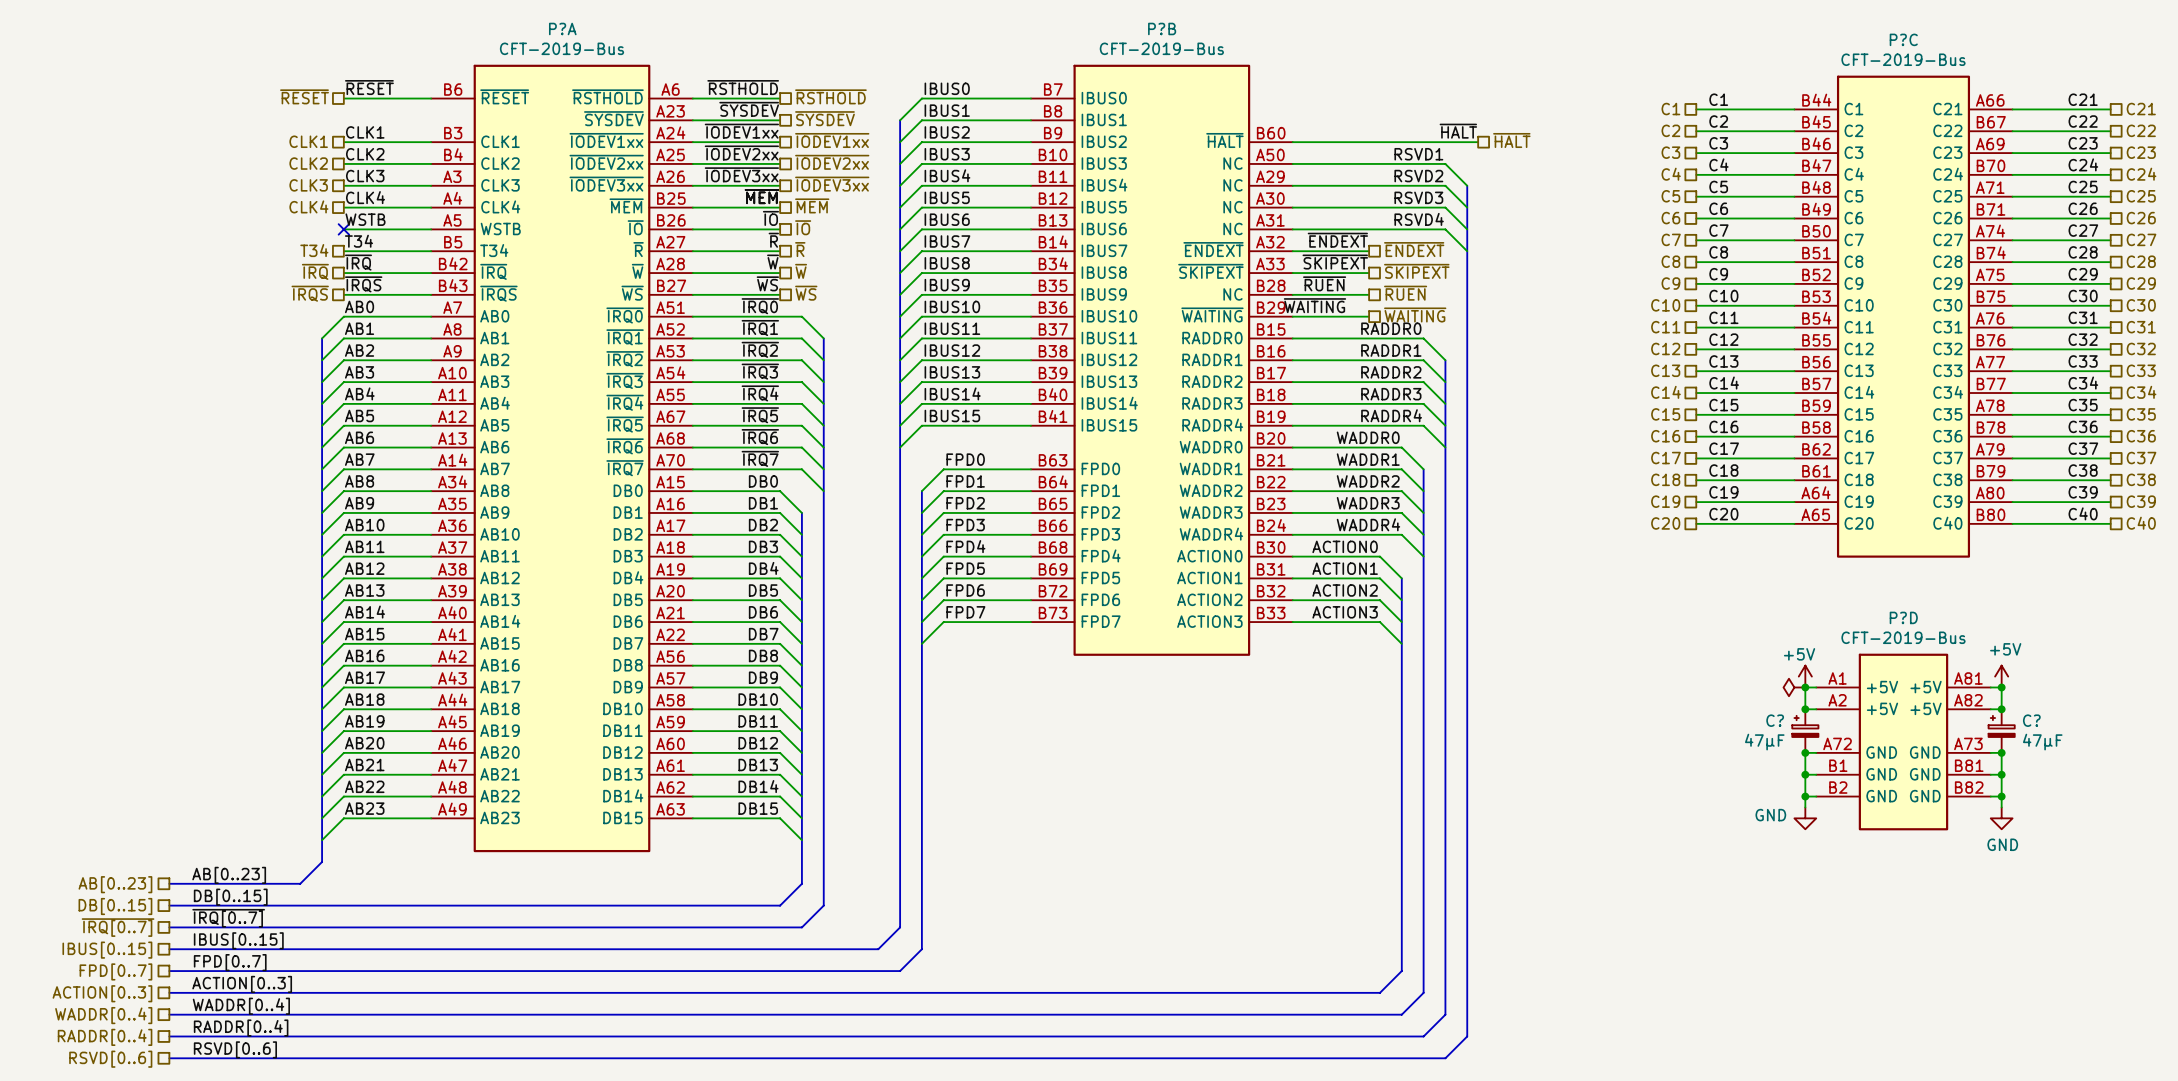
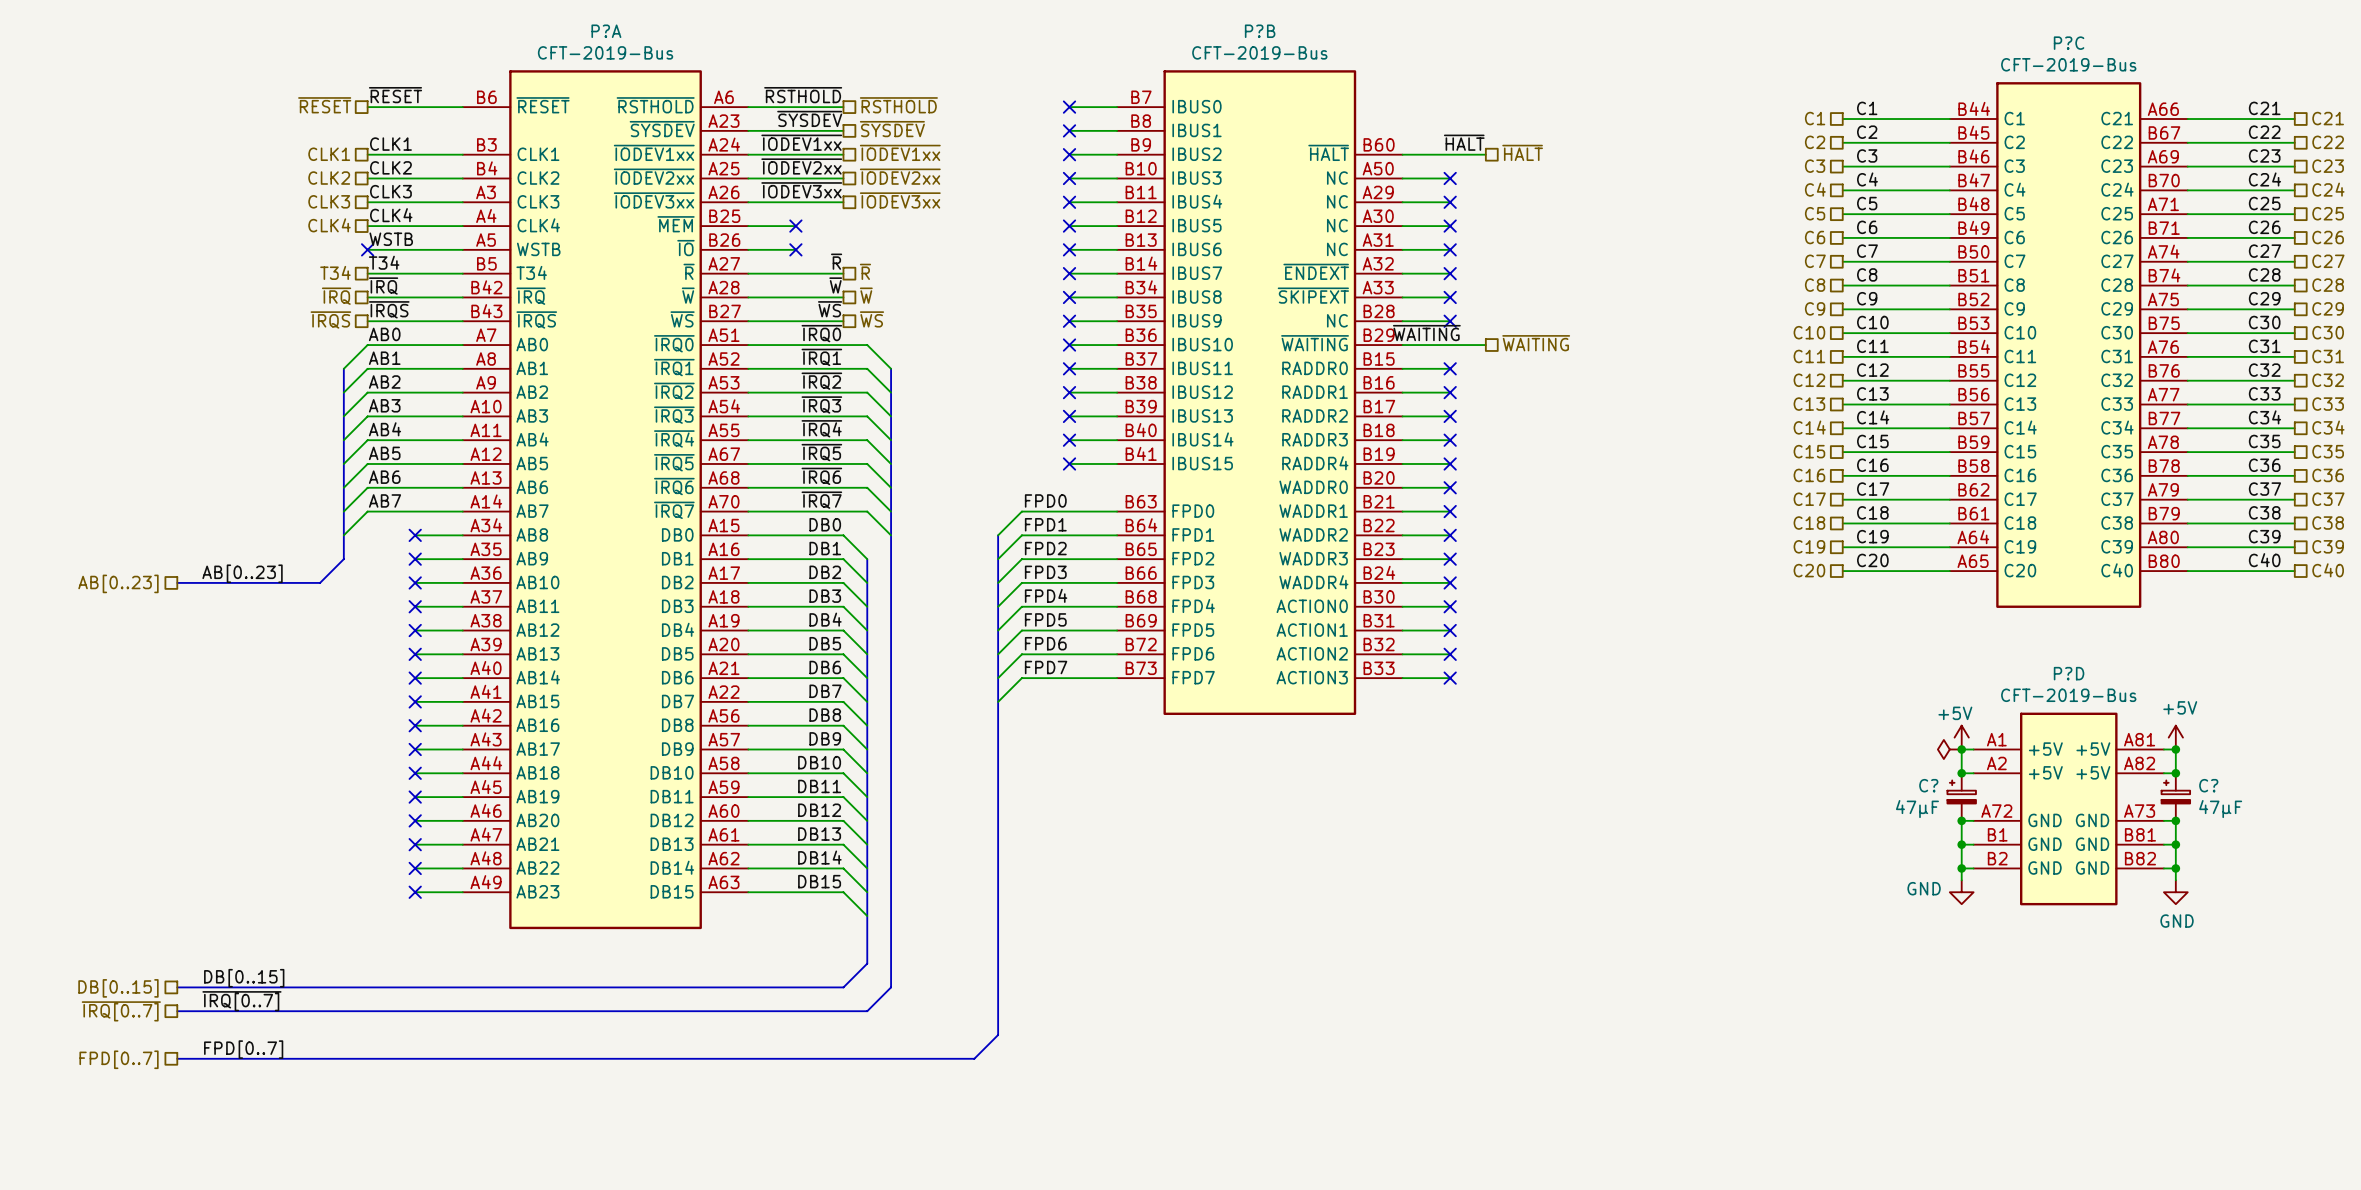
label: IBUS0 (947, 88) -> none
wire: (987, 98) (921, 98) (900, 120) -> none
no-connect mark: none -> (1069, 107)
label: IBUS1 (947, 110) -> none
bus: (900, 120) (900, 927) (878, 949) (169, 949) -> none
wire: (987, 120) (921, 120) (900, 142) -> none
no-connect mark: none -> (1069, 130)
label position: ~{HALT} (1458, 131) -> ~{HALT} (1464, 142)
label: IBUS2 (947, 132) -> none
hierarchical label position: ~{HALT} (1511, 140) -> ~{HALT} (1522, 152)
wire: (987, 142) (921, 142) (900, 163) -> none
no-connect mark: none -> (1069, 154)
wire: (1369, 142) (1478, 142) -> none
label: IBUS3 (947, 154) -> none
label: RSVD1 (1418, 154) -> none
wire: (987, 163) (921, 163) (900, 185) -> none
no-connect mark: none -> (1069, 178)
wire: (1336, 163) (1445, 163) (1467, 185) -> none
no-connect mark: none -> (1450, 178)
label: IBUS4 (947, 175) -> none
label: RSVD2 (1418, 176) -> none
wire: (987, 185) (921, 185) (900, 207) -> none
no-connect mark: none -> (1069, 202)
wire: (1336, 185) (1445, 185) (1467, 207) -> none
no-connect mark: none -> (1450, 202)
bus: (1467, 185) (1467, 1036) (1445, 1058) (169, 1058) -> none
label: ~{MEM} (761, 196) -> none
label: IBUS5 (947, 197) -> none
label: RSVD3 (1418, 197) -> none
hierarchical label: ~{MEM} (812, 205) -> none
wire: (736, 207) (780, 207) -> none
no-connect mark: none -> (795, 226)
wire: (987, 207) (921, 207) (900, 229) -> none
no-connect mark: none -> (1069, 226)
wire: (1336, 207) (1445, 207) (1467, 229) -> none
no-connect mark: none -> (1450, 226)
label: ~{IO} (770, 218) -> none
label: IBUS6 (947, 219) -> none
label: RSVD4 (1419, 219) -> none
hierarchical label: ~{IO} (803, 227) -> none
wire: (736, 229) (780, 229) -> none
no-connect mark: none -> (795, 249)
wire: (987, 229) (921, 229) (900, 251) -> none
no-connect mark: none -> (1069, 249)
wire: (1336, 229) (1445, 229) (1467, 251) -> none
no-connect mark: none -> (1450, 249)
label: ~{ENDEXT} (1337, 240) -> none
label: IBUS7 (947, 241) -> none
hierarchical label: ~{ENDEXT} (1414, 249) -> none
wire: (987, 251) (921, 251) (900, 273) -> none
no-connect mark: none -> (1069, 273)
wire: (1336, 251) (1369, 251) -> none
no-connect mark: none -> (1450, 273)
label: ~{SKIPEXT} (1335, 262) -> none
label: IBUS8 (947, 263) -> none
hierarchical label: ~{SKIPEXT} (1416, 271) -> none
wire: (987, 273) (921, 273) (900, 294) -> none
no-connect mark: none -> (1069, 297)
wire: (1336, 273) (1369, 273) -> none
no-connect mark: none -> (1450, 297)
label: ~{RUEN} (1324, 283) -> none
label: IBUS9 (947, 285) -> none
hierarchical label: ~{RUEN} (1405, 293) -> none
wire: (987, 294) (921, 294) (900, 316) -> none
no-connect mark: none -> (1069, 321)
wire: (1336, 294) (1369, 294) -> none
no-connect mark: none -> (1450, 321)
label: IBUS10 (952, 306) -> none
wire: (987, 316) (921, 316) (900, 338) -> none
no-connect mark: none -> (1069, 345)
label: IBUS11 (952, 328) -> none
label: RADDR0 (1391, 328) -> none
wire: (987, 338) (921, 338) (900, 360) -> none
no-connect mark: none -> (1069, 368)
wire: (1336, 338) (1423, 338) (1445, 360) -> none
no-connect mark: none -> (1450, 368)
label: IBUS12 (952, 350) -> none
label: RADDR1 (1391, 350) -> none
wire: (987, 360) (921, 360) (900, 382) -> none
no-connect mark: none -> (1069, 392)
wire: (1336, 360) (1423, 360) (1445, 382) -> none
no-connect mark: none -> (1450, 392)
bus: (1445, 360) (1445, 1014) (1423, 1036) (169, 1036) -> none
label: IBUS13 (952, 372) -> none
label: RADDR2 (1391, 372) -> none
wire: (987, 382) (921, 382) (900, 403) -> none
no-connect mark: none -> (1069, 416)
wire: (1336, 382) (1423, 382) (1445, 403) -> none
no-connect mark: none -> (1450, 416)
label: IBUS14 (952, 393) -> none
label: RADDR3 (1391, 394) -> none
wire: (987, 403) (921, 403) (900, 425) -> none
no-connect mark: none -> (1069, 440)
wire: (1336, 403) (1423, 403) (1445, 425) -> none
no-connect mark: none -> (1450, 440)
label: IBUS15 (952, 415) -> none
label: RADDR4 (1391, 415) -> none
wire: (987, 425) (921, 425) (900, 447) -> none
no-connect mark: none -> (1069, 463)
wire: (1336, 425) (1423, 425) (1445, 447) -> none
no-connect mark: none -> (1450, 463)
label: WADDR0 (1368, 437) -> none
wire: (1336, 447) (1401, 447) (1423, 469) -> none
no-connect mark: none -> (1450, 487)
label: WADDR1 (1368, 459) -> none
wire: (1336, 469) (1401, 469) (1423, 491) -> none
no-connect mark: none -> (1450, 511)
bus: (1423, 469) (1423, 992) (1401, 1014) (169, 1014) -> none
label: AB8 (359, 481) -> none
label: WADDR2 (1368, 481) -> none
wire: (387, 491) (343, 491) (322, 512) -> none
no-connect mark: none -> (415, 535)
wire: (1336, 491) (1401, 491) (1423, 512) -> none
no-connect mark: none -> (1450, 535)
label: AB9 (359, 503) -> none
label: WADDR3 (1368, 503) -> none
bus: (322, 512) (322, 861) (300, 883) (169, 883) -> (343, 559) (320, 582) (177, 582)
wire: (387, 512) (343, 512) (322, 534) -> none
no-connect mark: none -> (415, 559)
wire: (1336, 512) (1401, 512) (1423, 534) -> none
no-connect mark: none -> (1450, 559)
label: WADDR4 (1368, 524) -> none
label: AB10 (364, 525) -> none
label: none -> AB[0..23] (242, 573)
wire: (387, 534) (343, 534) (322, 556) -> none
no-connect mark: none -> (415, 582)
wire: (1336, 534) (1401, 534) (1423, 556) -> none
no-connect mark: none -> (1450, 582)
hierarchical label: none -> AB[0..23] (118, 583)
label: AB11 (364, 546) -> none
label: ACTION0 (1345, 546) -> none
wire: (387, 556) (343, 556) (322, 578) -> none
no-connect mark: none -> (415, 606)
wire: (1336, 556) (1379, 556) (1401, 578) -> none
no-connect mark: none -> (1450, 606)
label: AB12 (364, 568) -> none
label: ACTION1 (1345, 568) -> none
wire: (387, 578) (343, 578) (322, 600) -> none
no-connect mark: none -> (415, 630)
wire: (1336, 578) (1379, 578) (1401, 600) -> none
no-connect mark: none -> (1450, 630)
bus: (1401, 578) (1401, 971) (1379, 992) (169, 992) -> none
label: AB13 (364, 590) -> none
label: ACTION2 (1345, 590) -> none
wire: (387, 600) (343, 600) (322, 622) -> none
no-connect mark: none -> (415, 654)
wire: (1336, 600) (1379, 600) (1401, 622) -> none
no-connect mark: none -> (1450, 654)
label: AB14 (364, 612) -> none
label: ACTION3 (1345, 612) -> none
wire: (387, 622) (343, 622) (322, 643) -> none
no-connect mark: none -> (415, 678)
wire: (1336, 622) (1379, 622) (1401, 643) -> none
no-connect mark: none -> (1450, 678)
label: AB15 (364, 634) -> none
wire: (387, 643) (343, 643) (322, 665) -> none
no-connect mark: none -> (415, 701)
label: AB16 (364, 655) -> none
wire: (387, 665) (343, 665) (322, 687) -> none
no-connect mark: none -> (415, 725)
label: AB17 (364, 677) -> none
wire: (387, 687) (343, 687) (322, 709) -> none
no-connect mark: none -> (415, 749)
label: AB18 (364, 699) -> none
wire: (387, 709) (343, 709) (322, 731) -> none
no-connect mark: none -> (415, 773)
label: AB19 (364, 721) -> none
wire: (387, 731) (343, 731) (322, 752) -> none
no-connect mark: none -> (415, 797)
label: AB20 (364, 743) -> none
wire: (387, 752) (343, 752) (322, 774) -> none
no-connect mark: none -> (415, 820)
label: AB21 (364, 765) -> none
wire: (387, 774) (343, 774) (322, 796) -> none
no-connect mark: none -> (415, 844)
label: AB22 (364, 786) -> none
wire: (387, 796) (343, 796) (322, 818) -> none
no-connect mark: none -> (415, 868)
label: AB23 (364, 808) -> none
wire: (387, 818) (343, 818) (322, 840) -> none
no-connect mark: none -> (415, 892)
label: AB[0..23] (229, 875) -> none
hierarchical label: AB[0..23] (115, 884) -> none
label: IBUS[0..15] (238, 940) -> none
hierarchical label: IBUS[0..15] (107, 950) -> none
label: ACTION[0..3] (242, 984) -> none
hierarchical label: ACTION[0..3] (102, 993) -> none
label: WADDR[0..4] (241, 1006) -> none
hierarchical label: WADDR[0..4] (103, 1015) -> none
label: RADDR[0..4] (241, 1028) -> none
hierarchical label: RADDR[0..4] (105, 1037) -> none
label: RSVD[0..6] (235, 1049) -> none
hierarchical label: RSVD[0..6] (110, 1059) -> none

